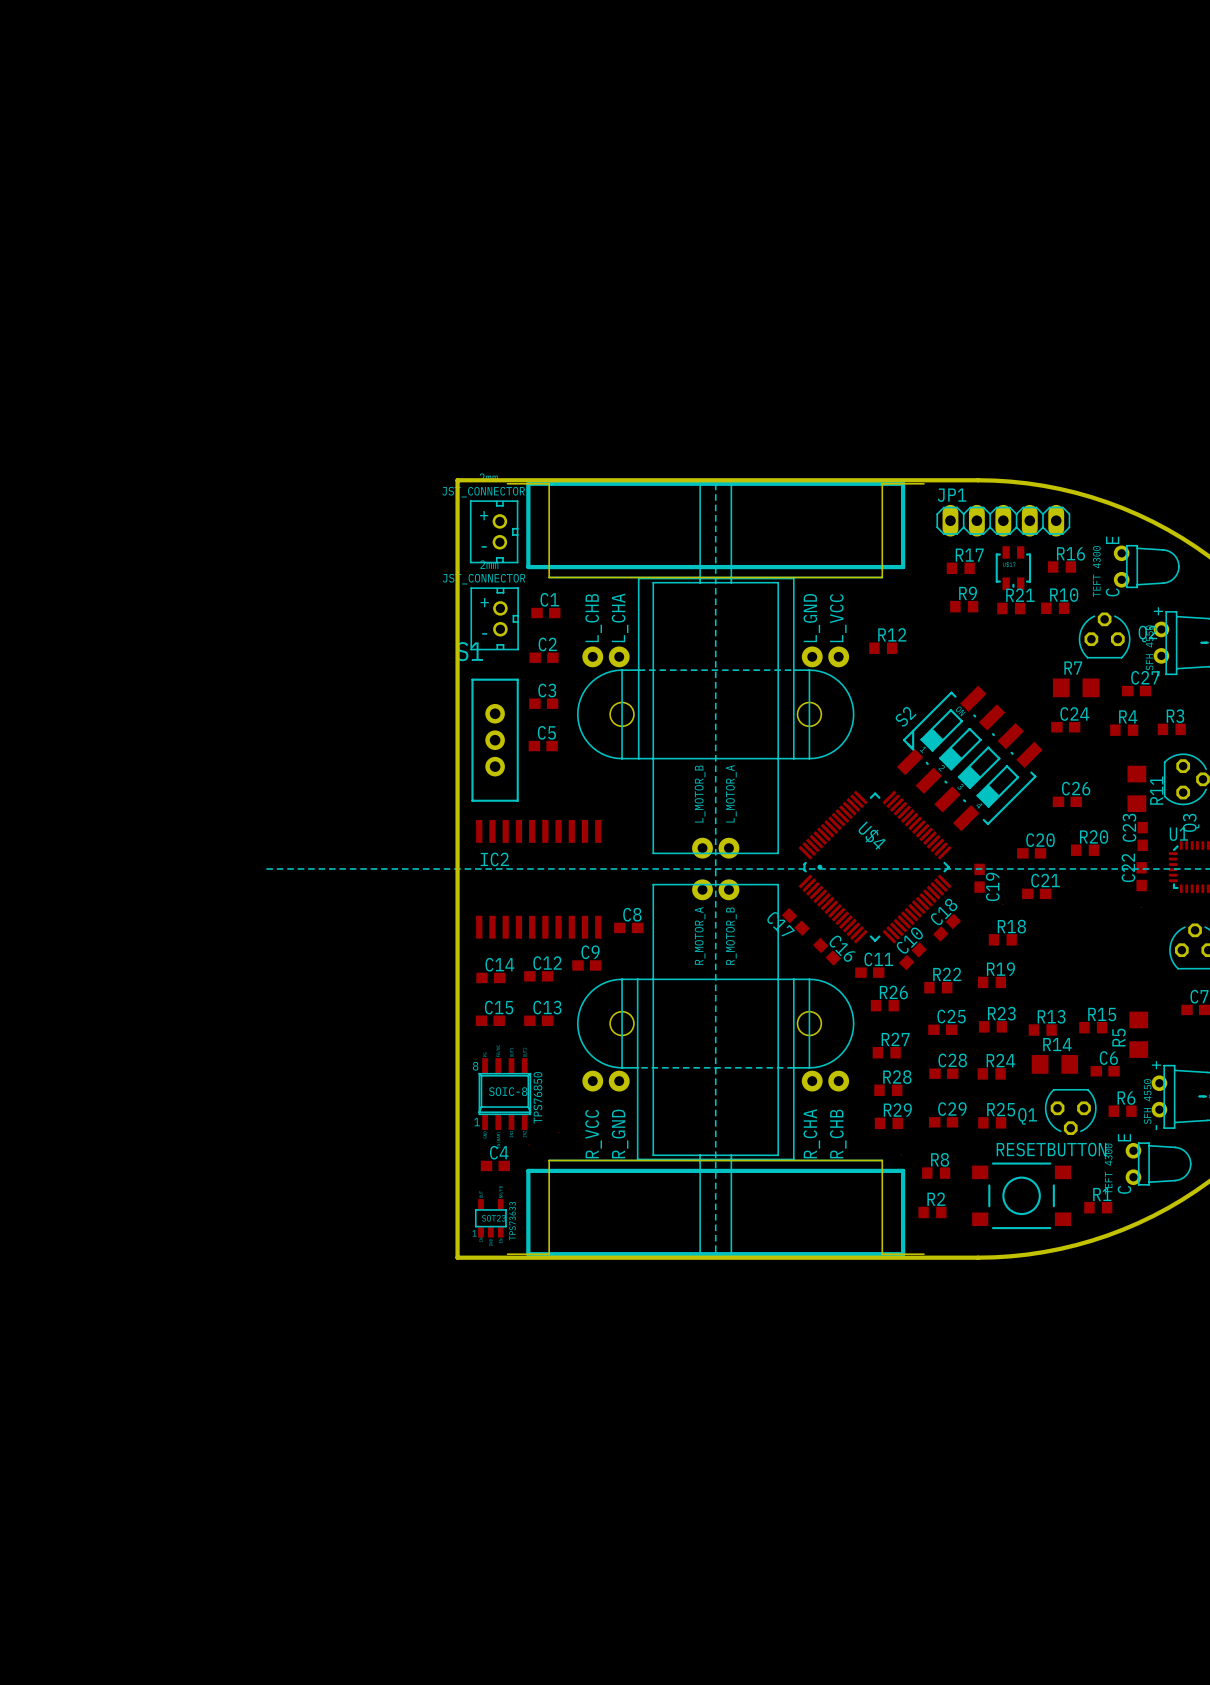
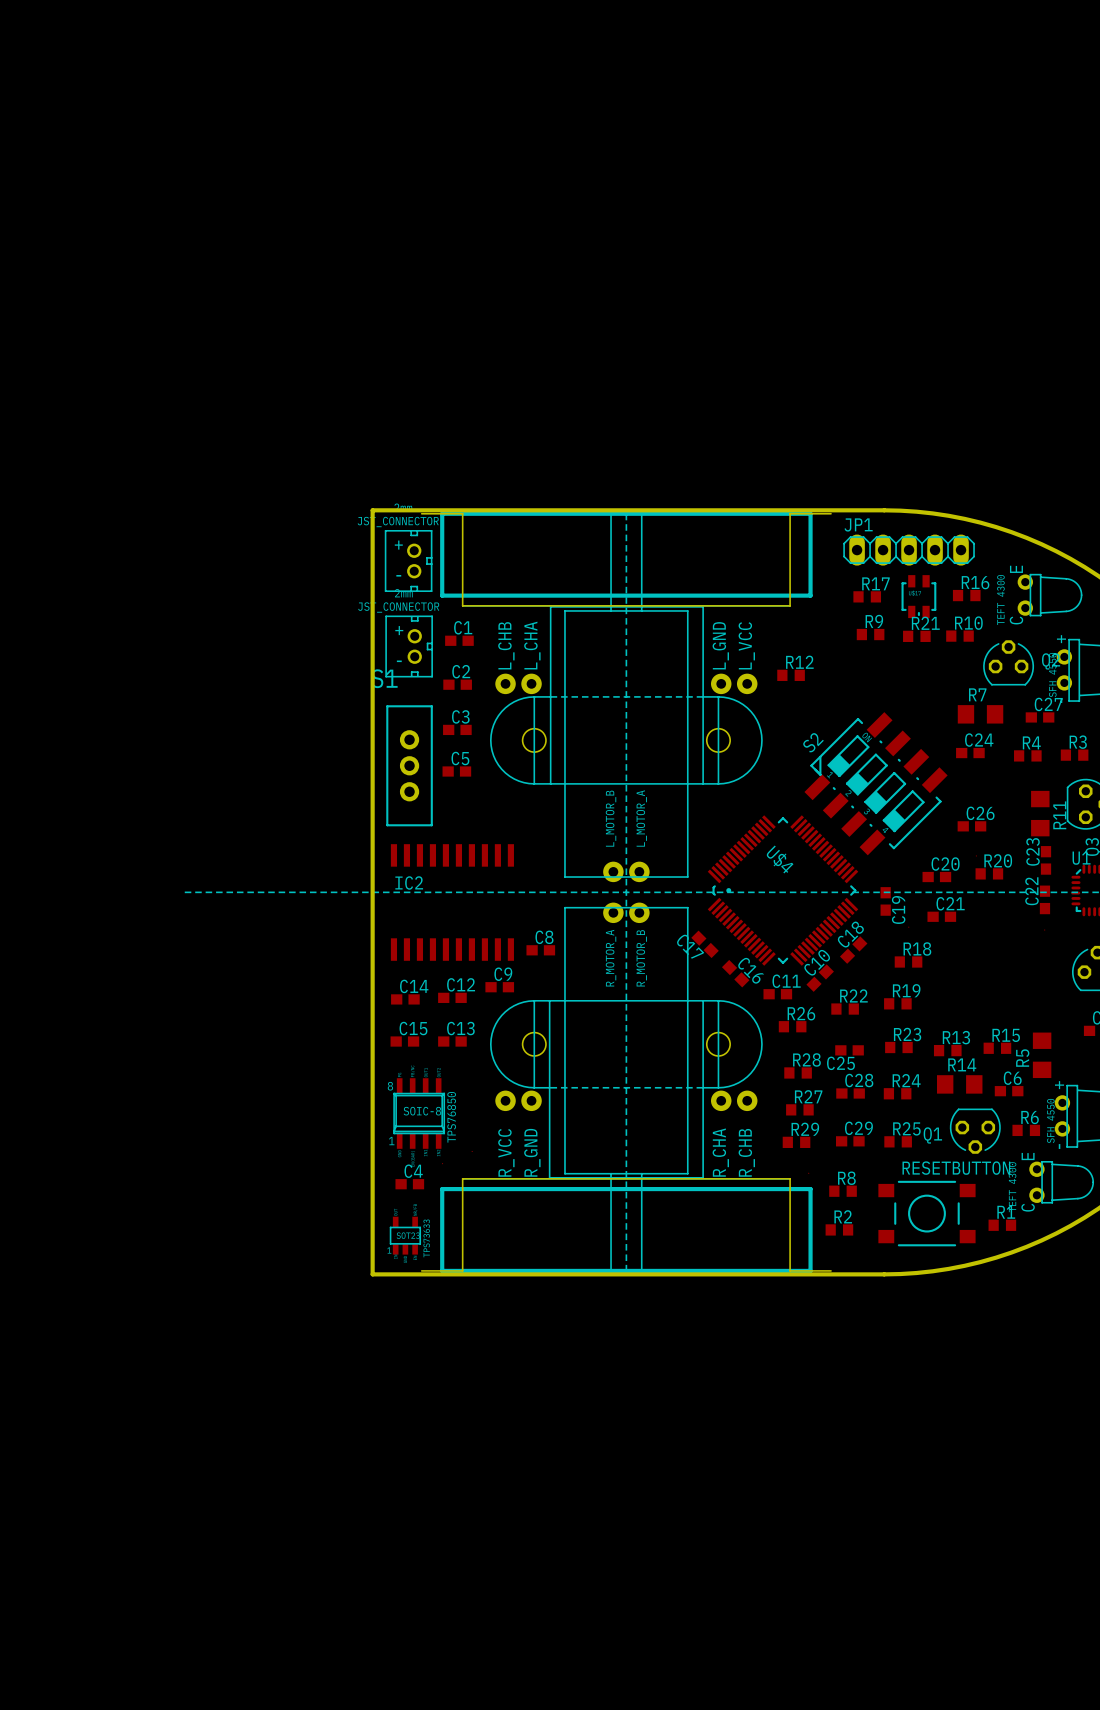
C25 name position: C25 (951, 1016) -> C25 (840, 1063)
R27 position: (886, 1052) -> (799, 1109)
R28 position: (888, 1090) -> (798, 1072)

